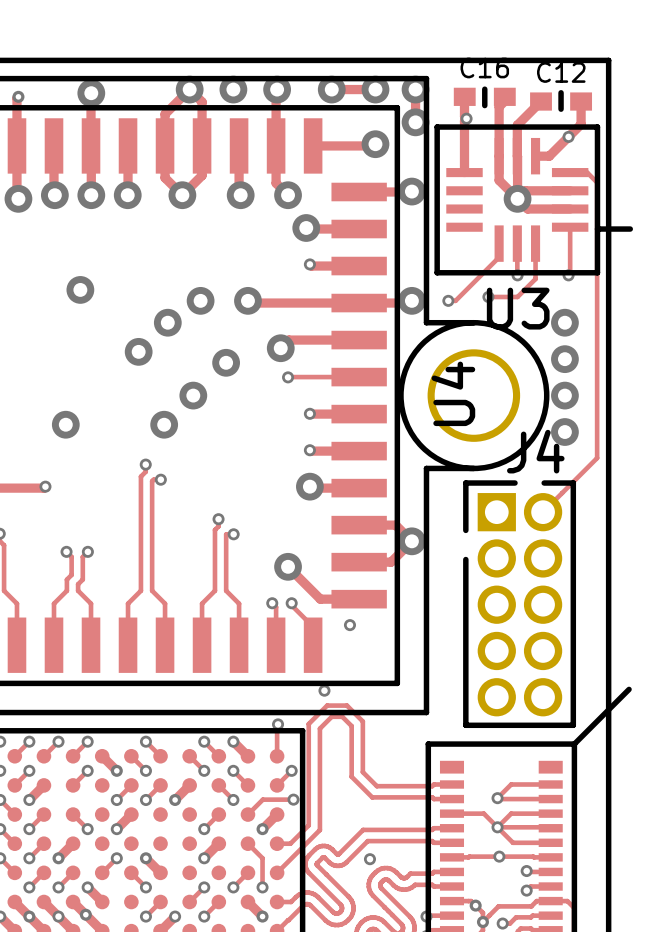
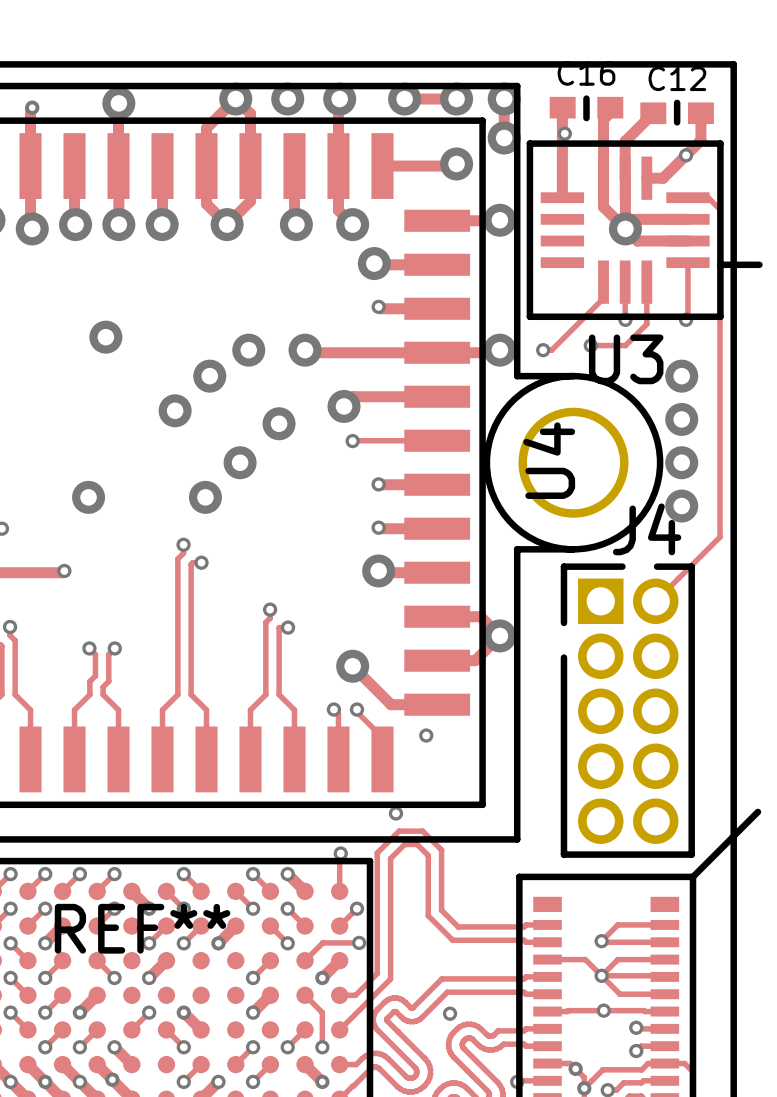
REF** name: none -> REF** (142, 928)

